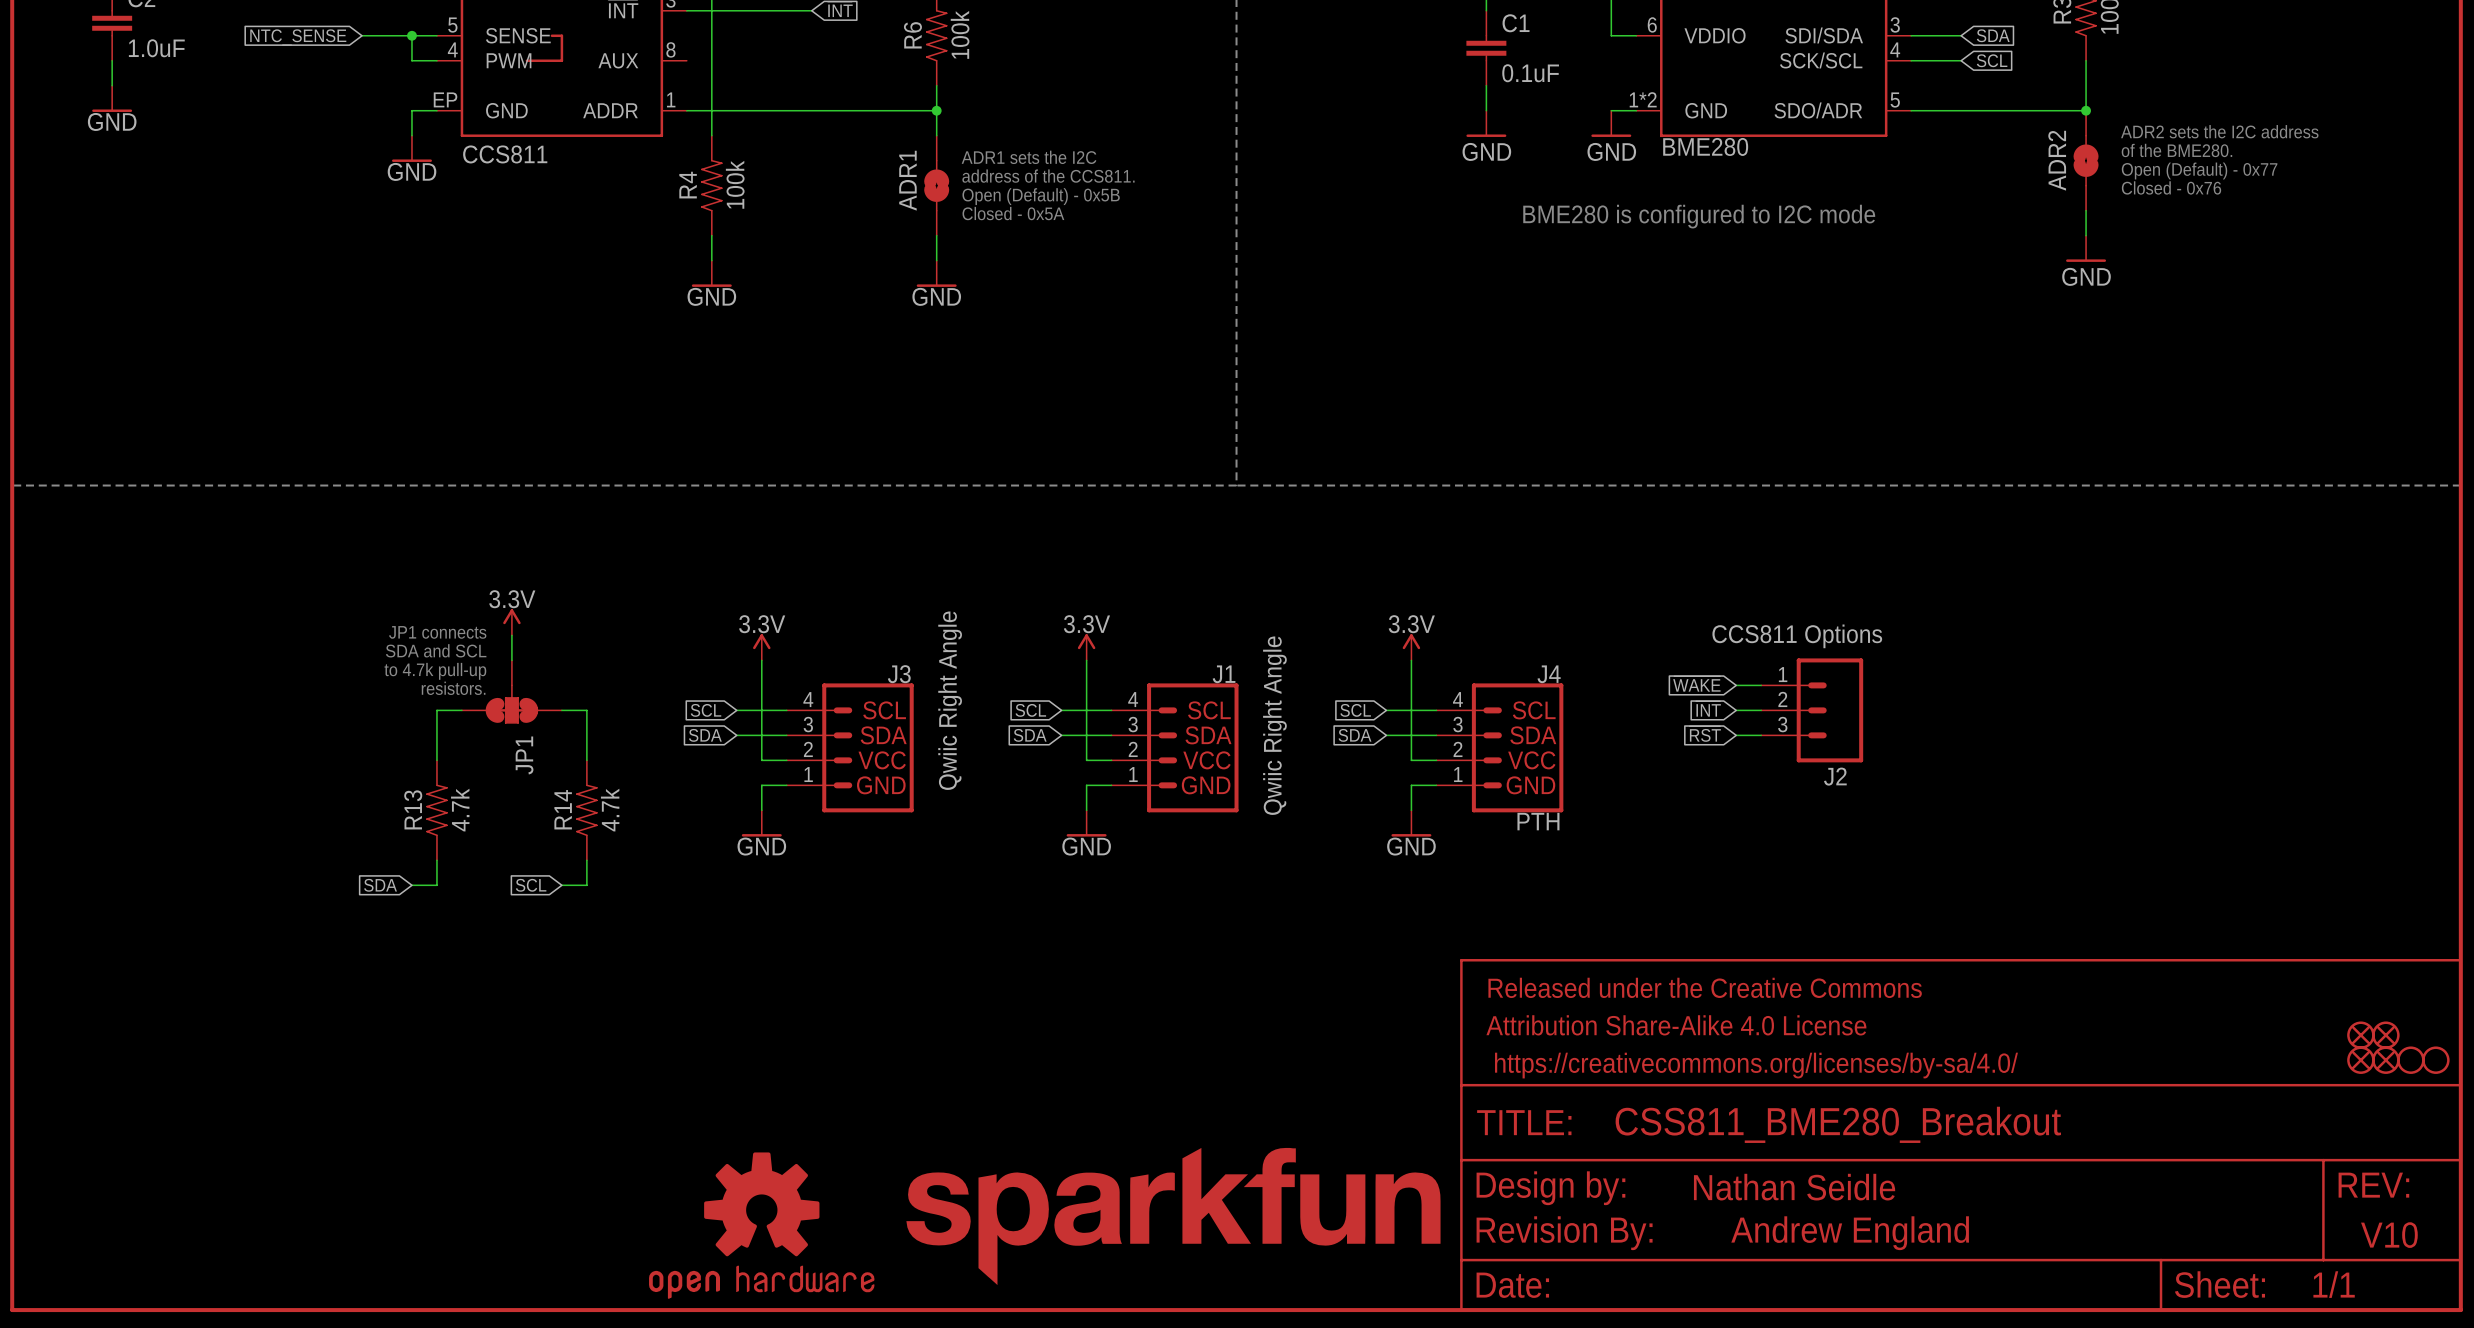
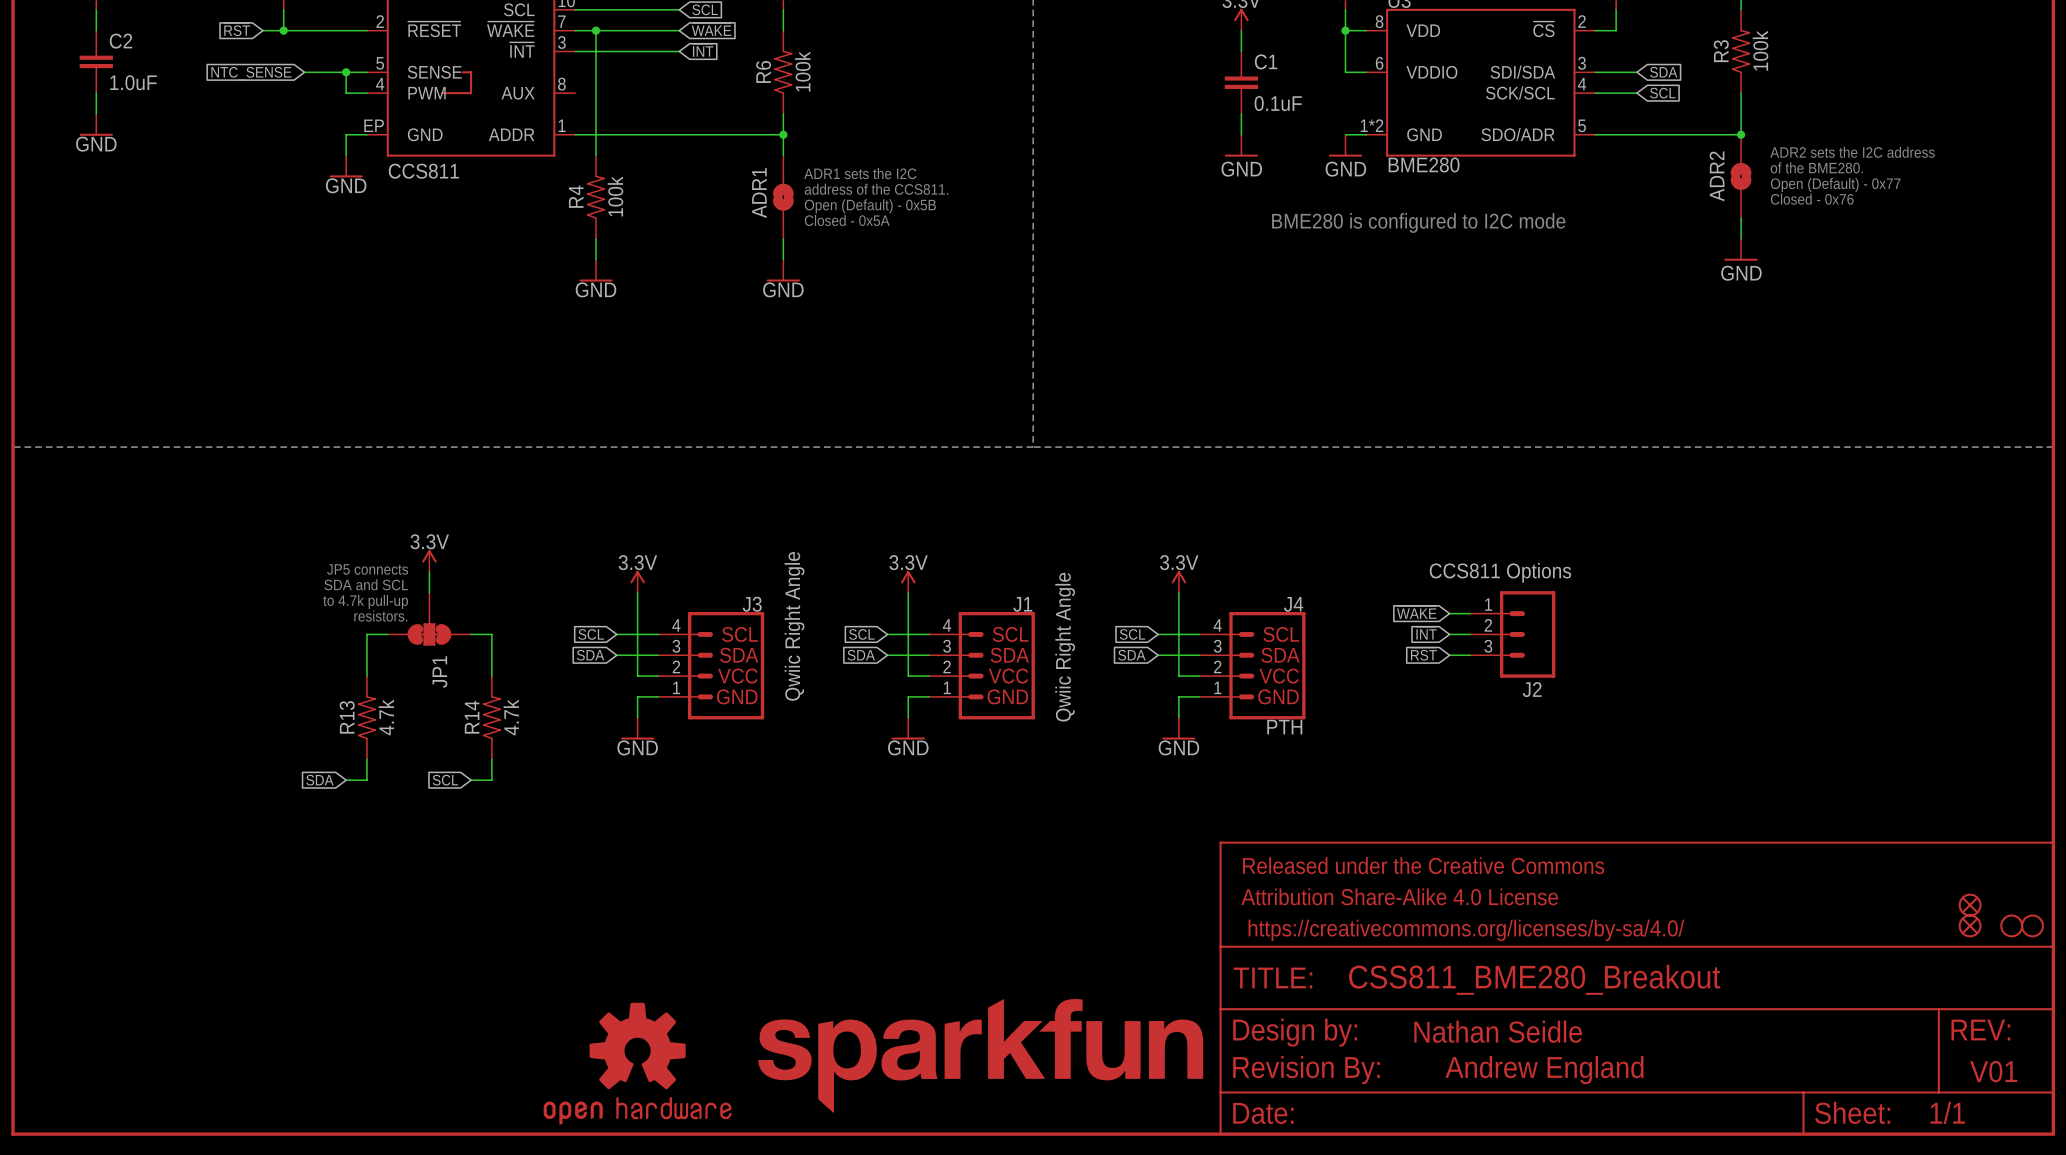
text: JP1 connects (437, 632) -> JP5 connects (367, 569)
part: (2385, 1035) -> none
part: (2385, 1060) -> none
text: V10 (2389, 1235) -> V01 (1993, 1071)

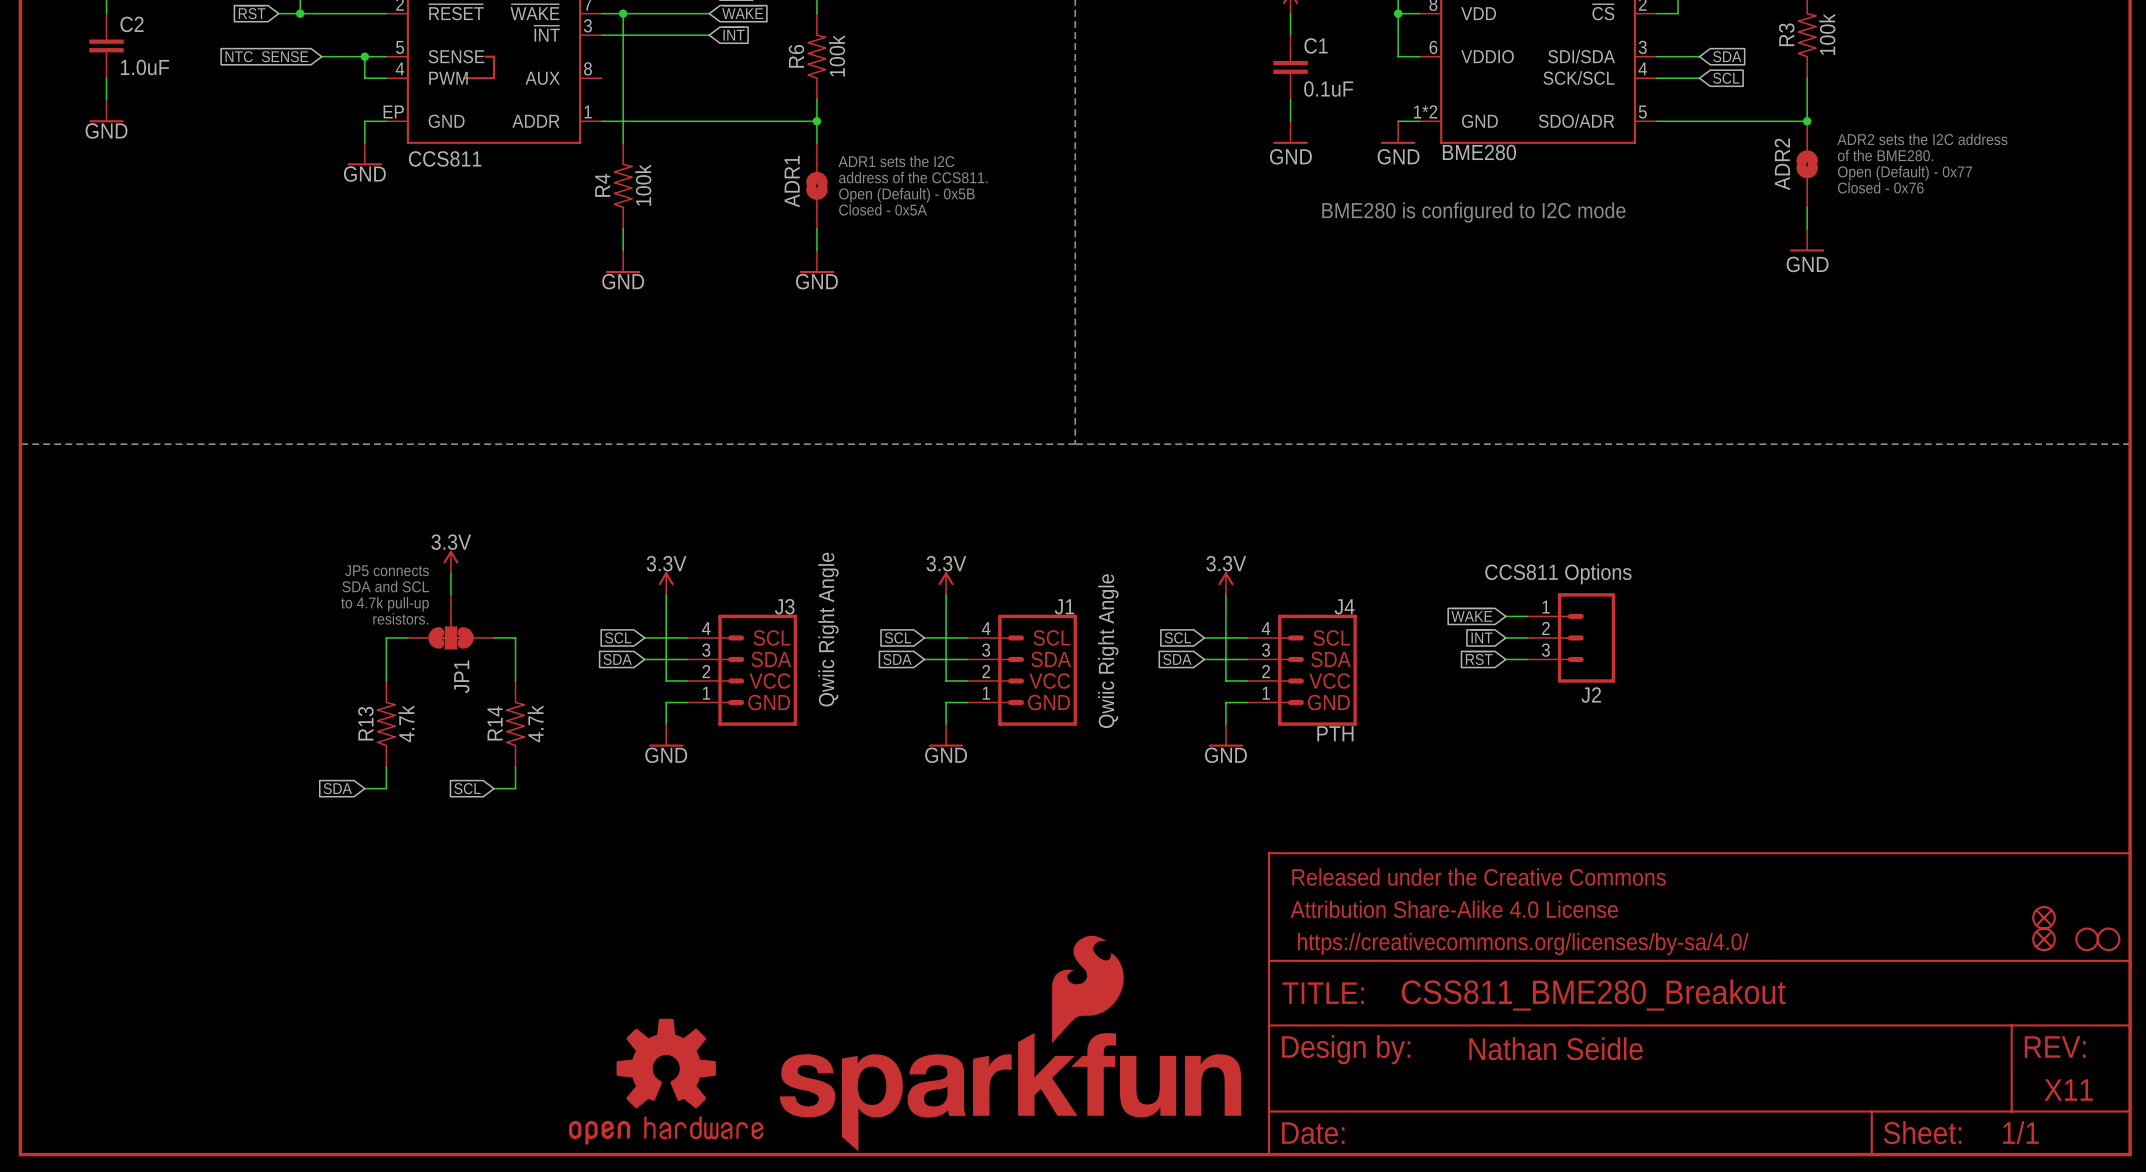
part: none -> (1010, 1043)
part: (980, 1056) -> none
part: (1306, 1070) -> none
text: Andrew England (1544, 1070) -> none
text: V01 (1993, 1071) -> X11 (2068, 1090)

